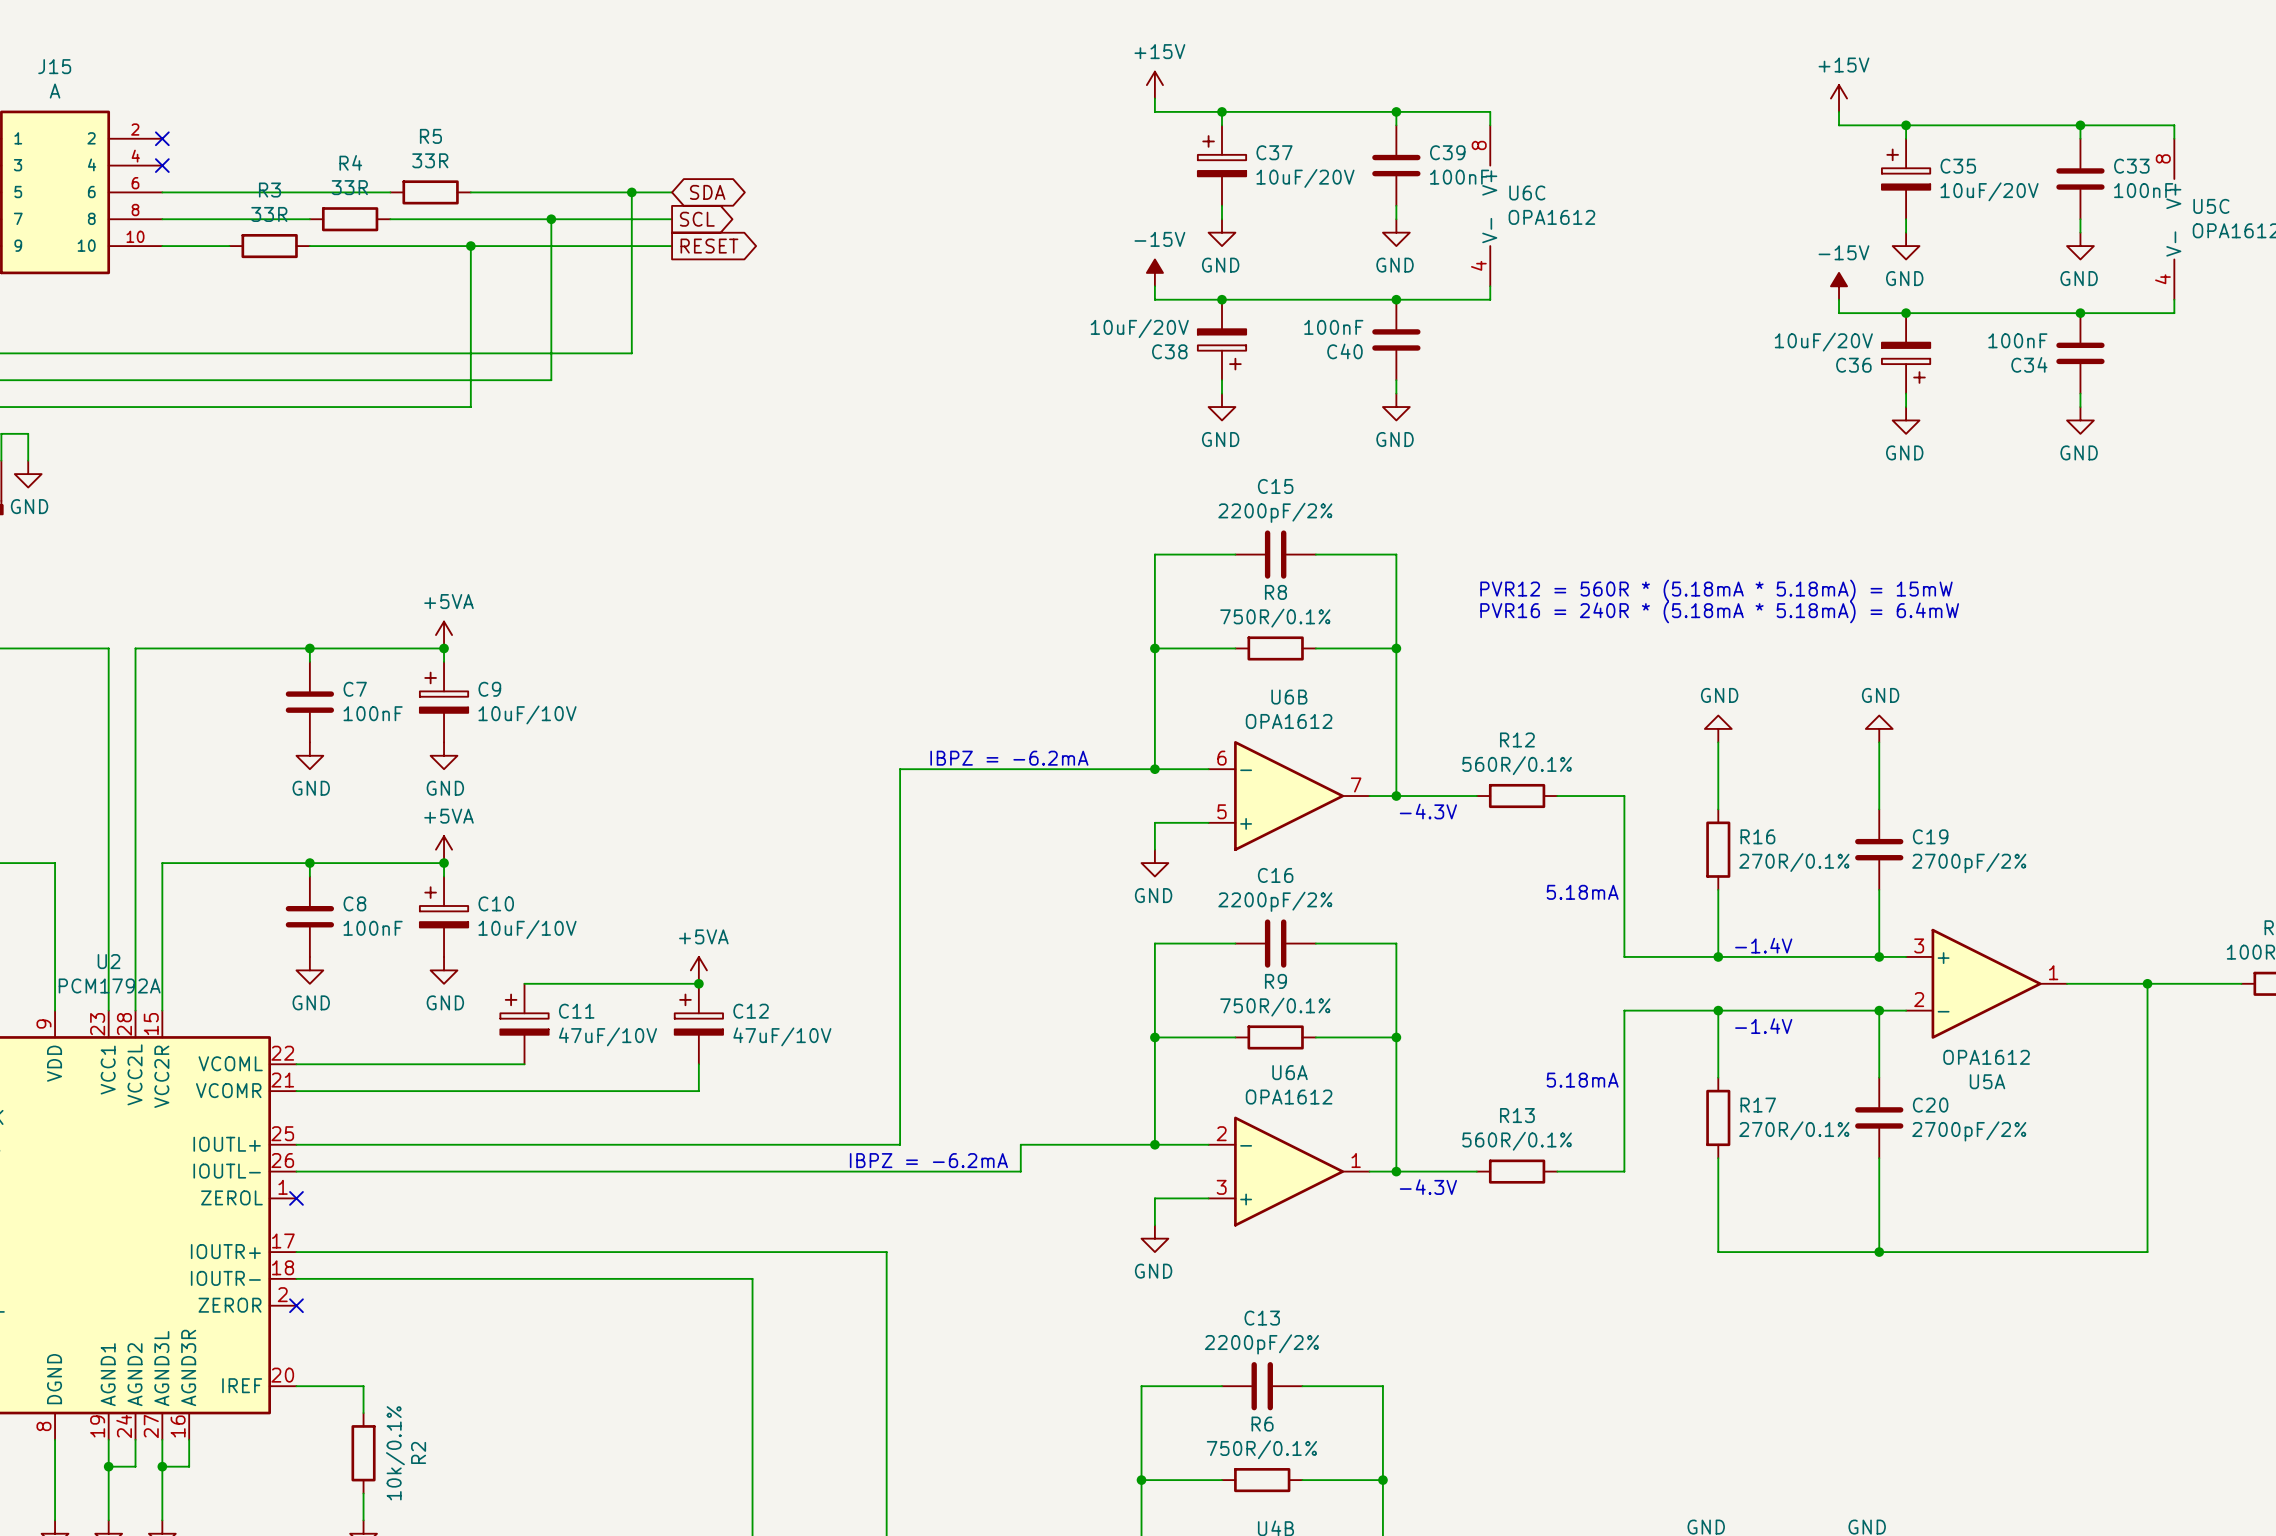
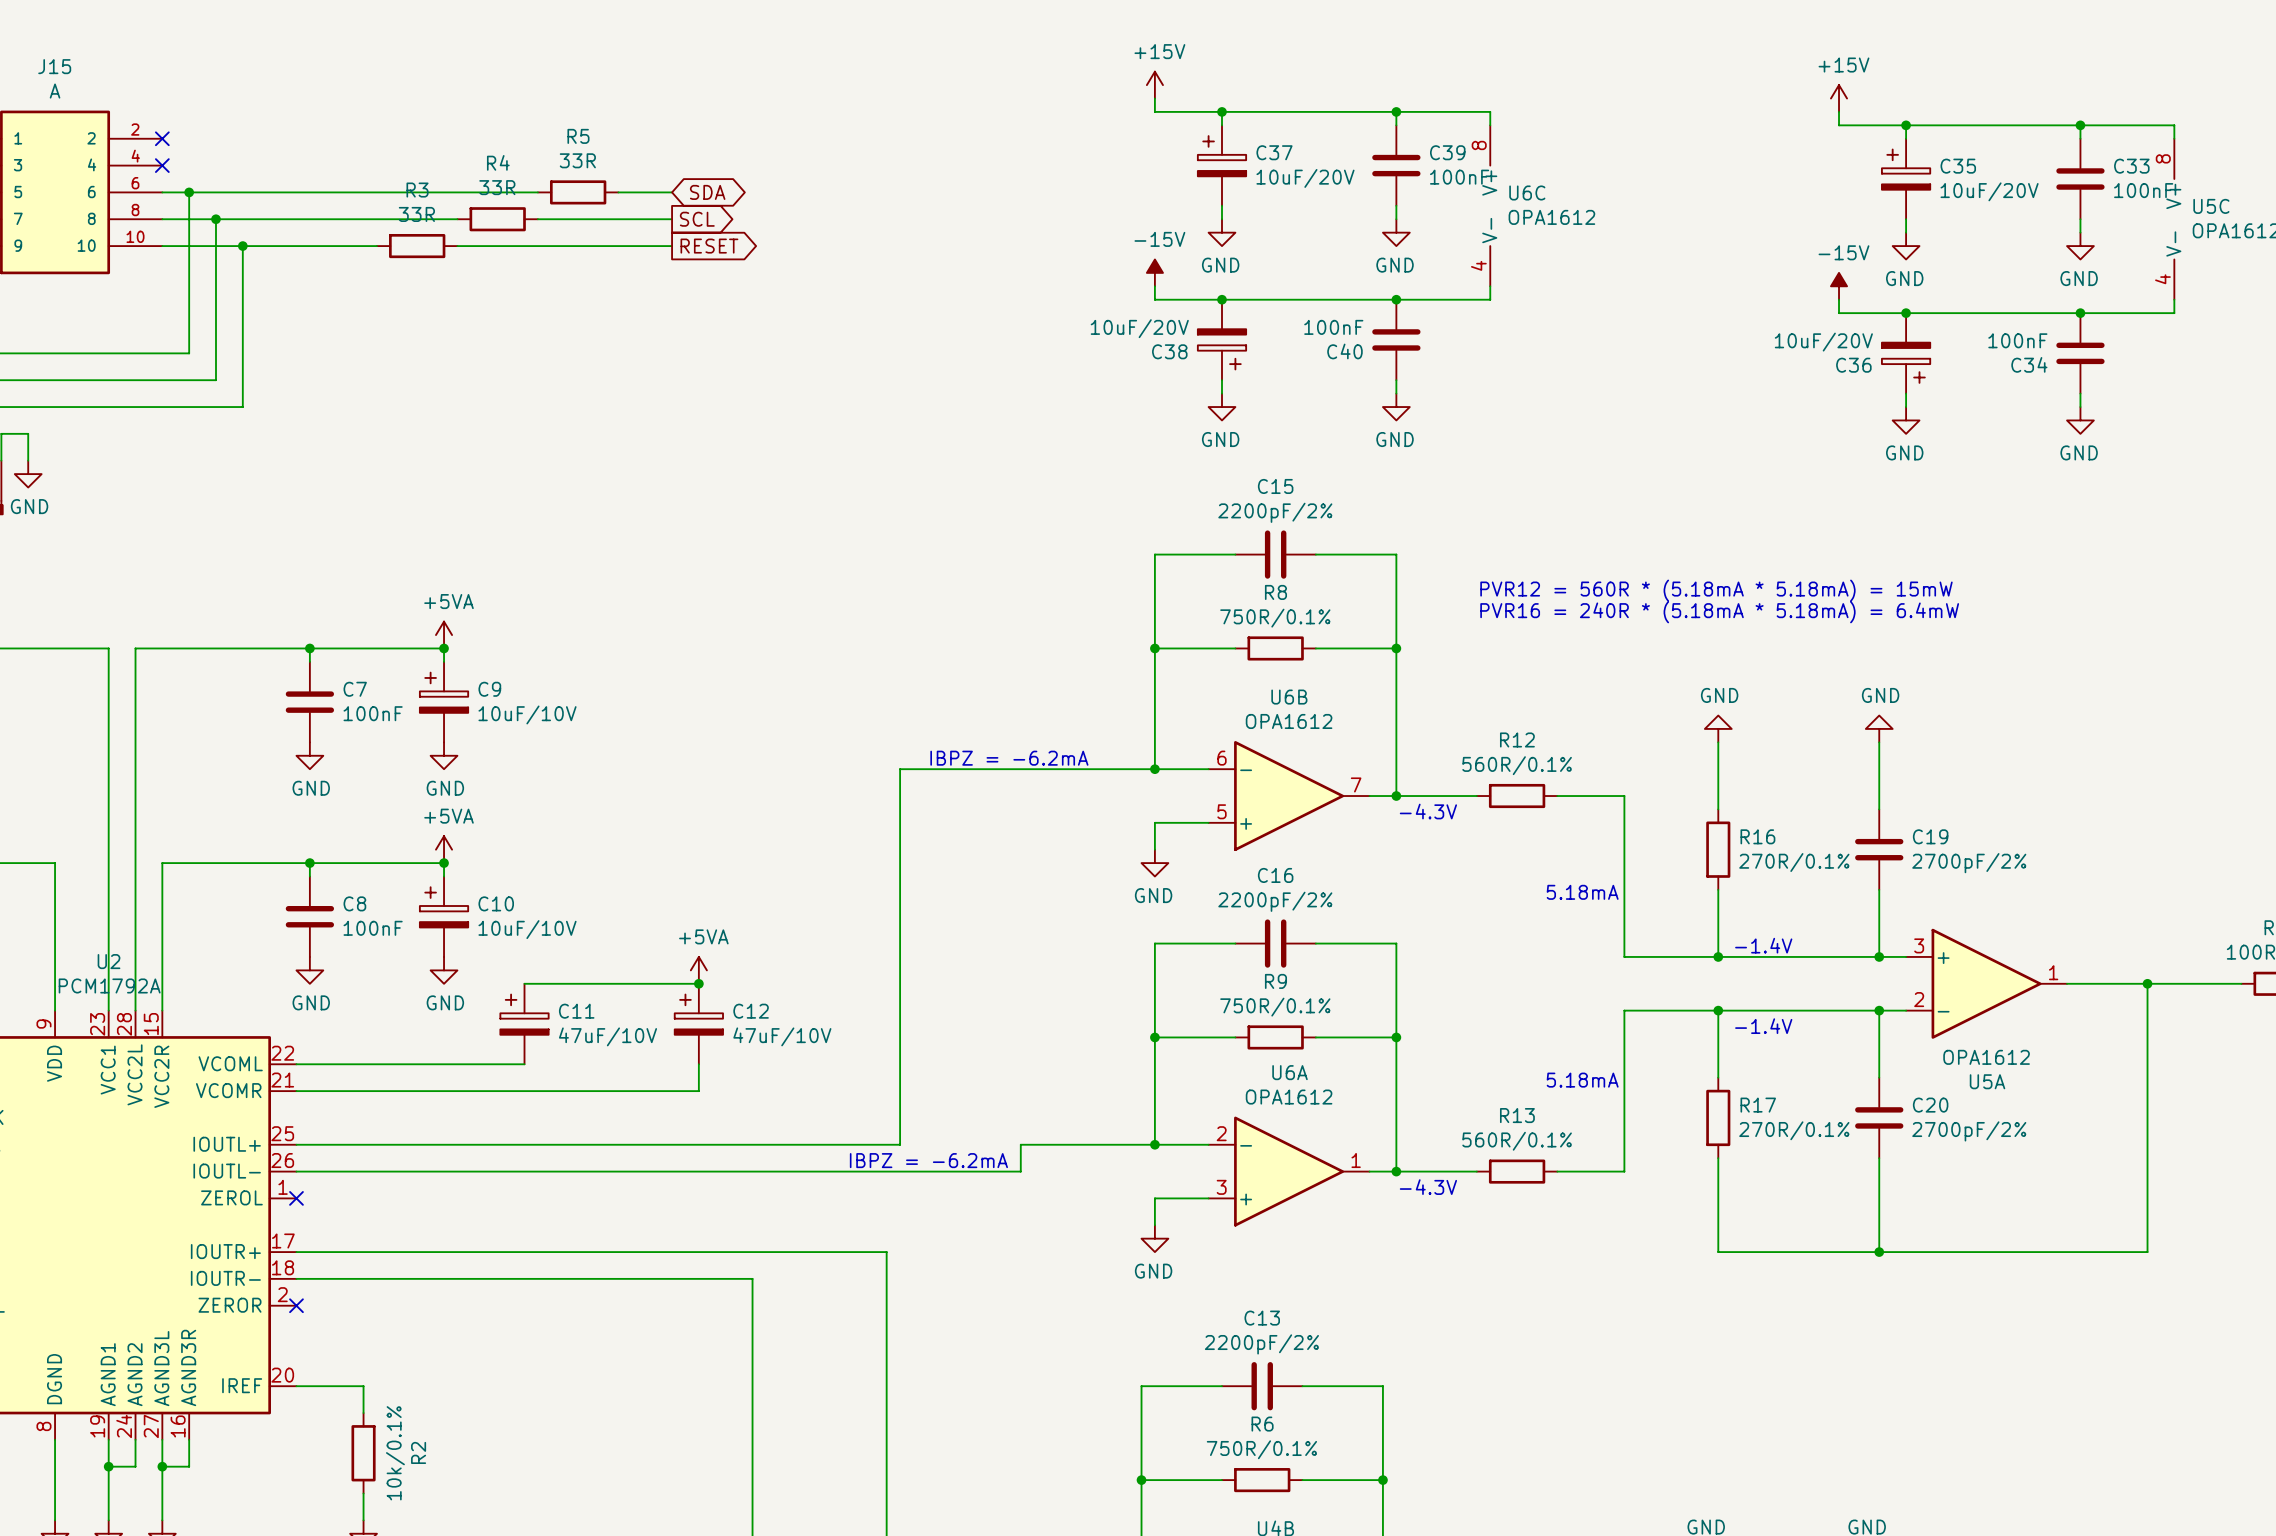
junction: none -> (189, 192)
R5 position: (430, 192) -> (578, 192)
wire: (537, 192) (618, 192) -> (390, 192) (470, 192)
wire: (631, 192) (631, 353) (189, 353) -> (189, 192) (189, 353)
junction: (631, 192) -> none
junction: none -> (215, 219)
R4 position: (350, 219) -> (497, 219)
wire: (457, 219) (537, 219) -> (309, 219) (390, 219)
wire: (551, 219) (551, 380) (215, 380) -> (215, 219) (215, 380)
junction: (551, 219) -> none
junction: none -> (242, 246)
R3 position: (269, 246) -> (417, 246)
wire: (376, 246) (457, 246) -> (229, 246) (309, 246)
wire: (470, 246) (470, 407) (242, 407) -> (242, 246) (242, 407)
junction: (470, 246) -> none

